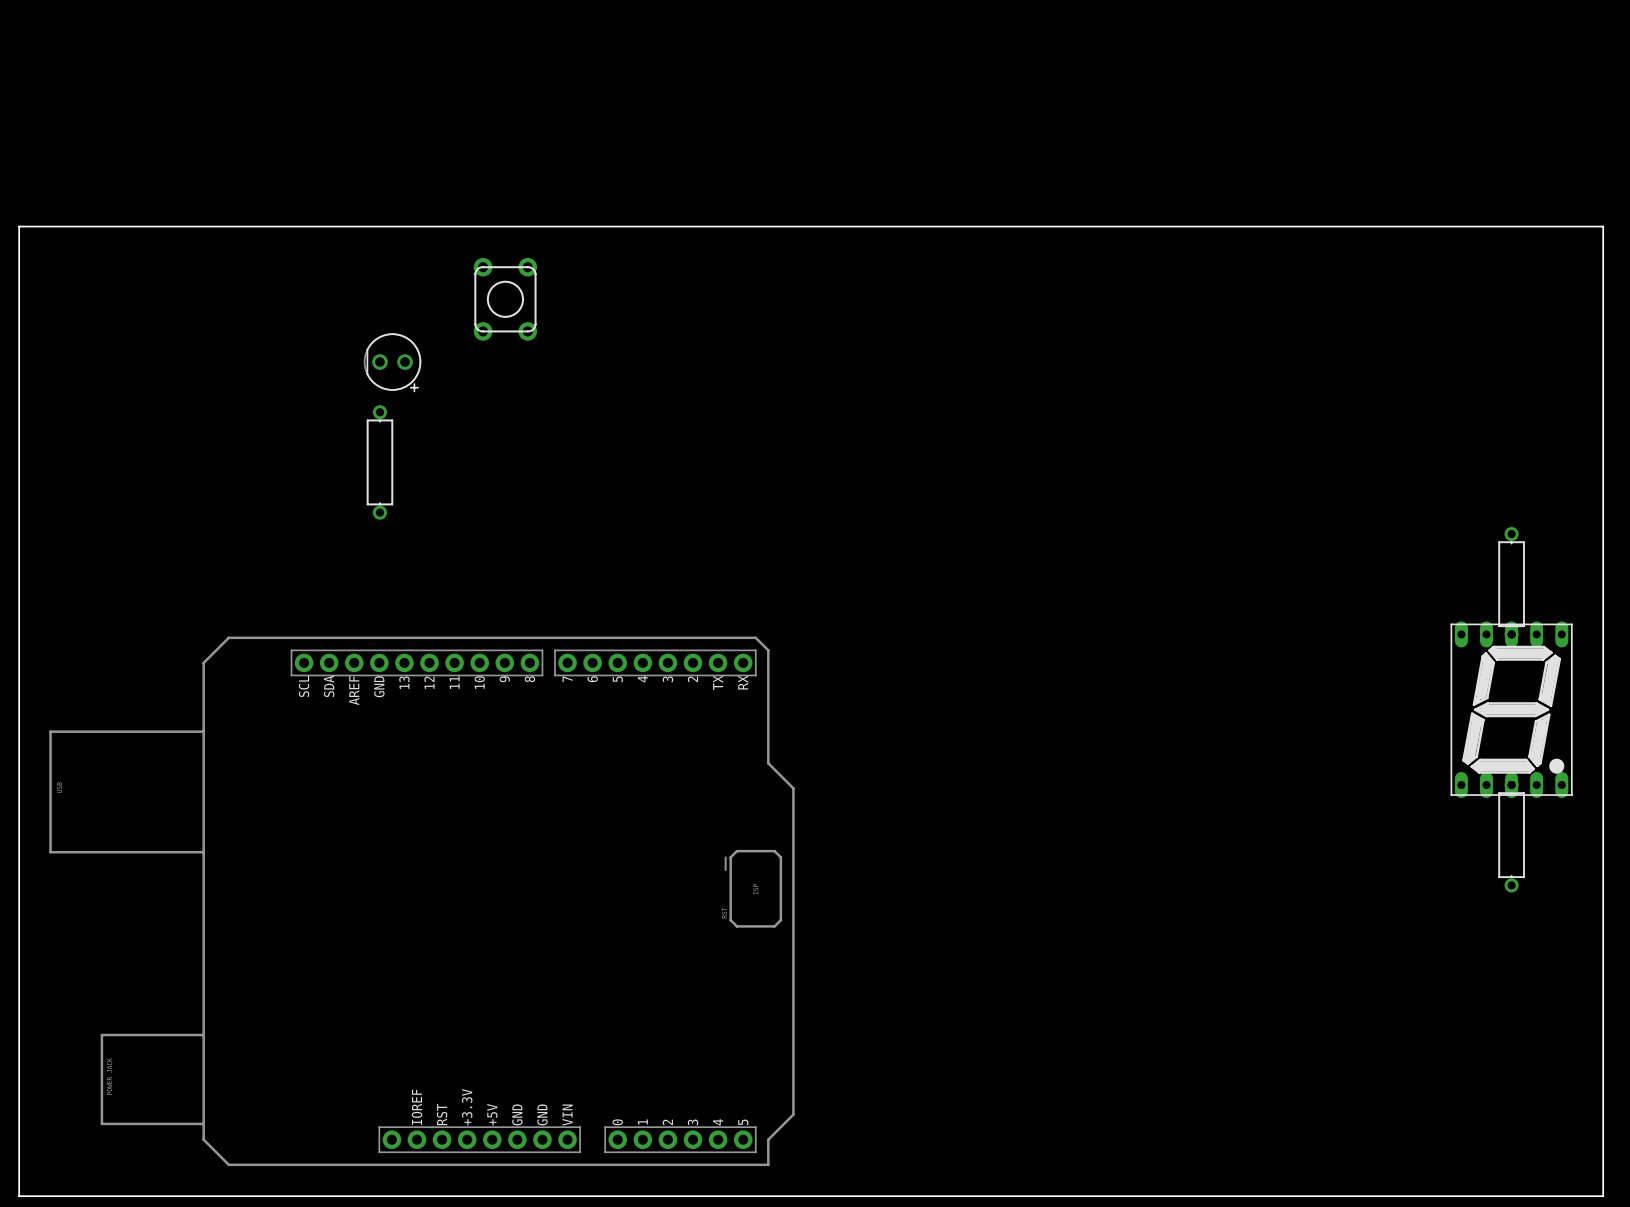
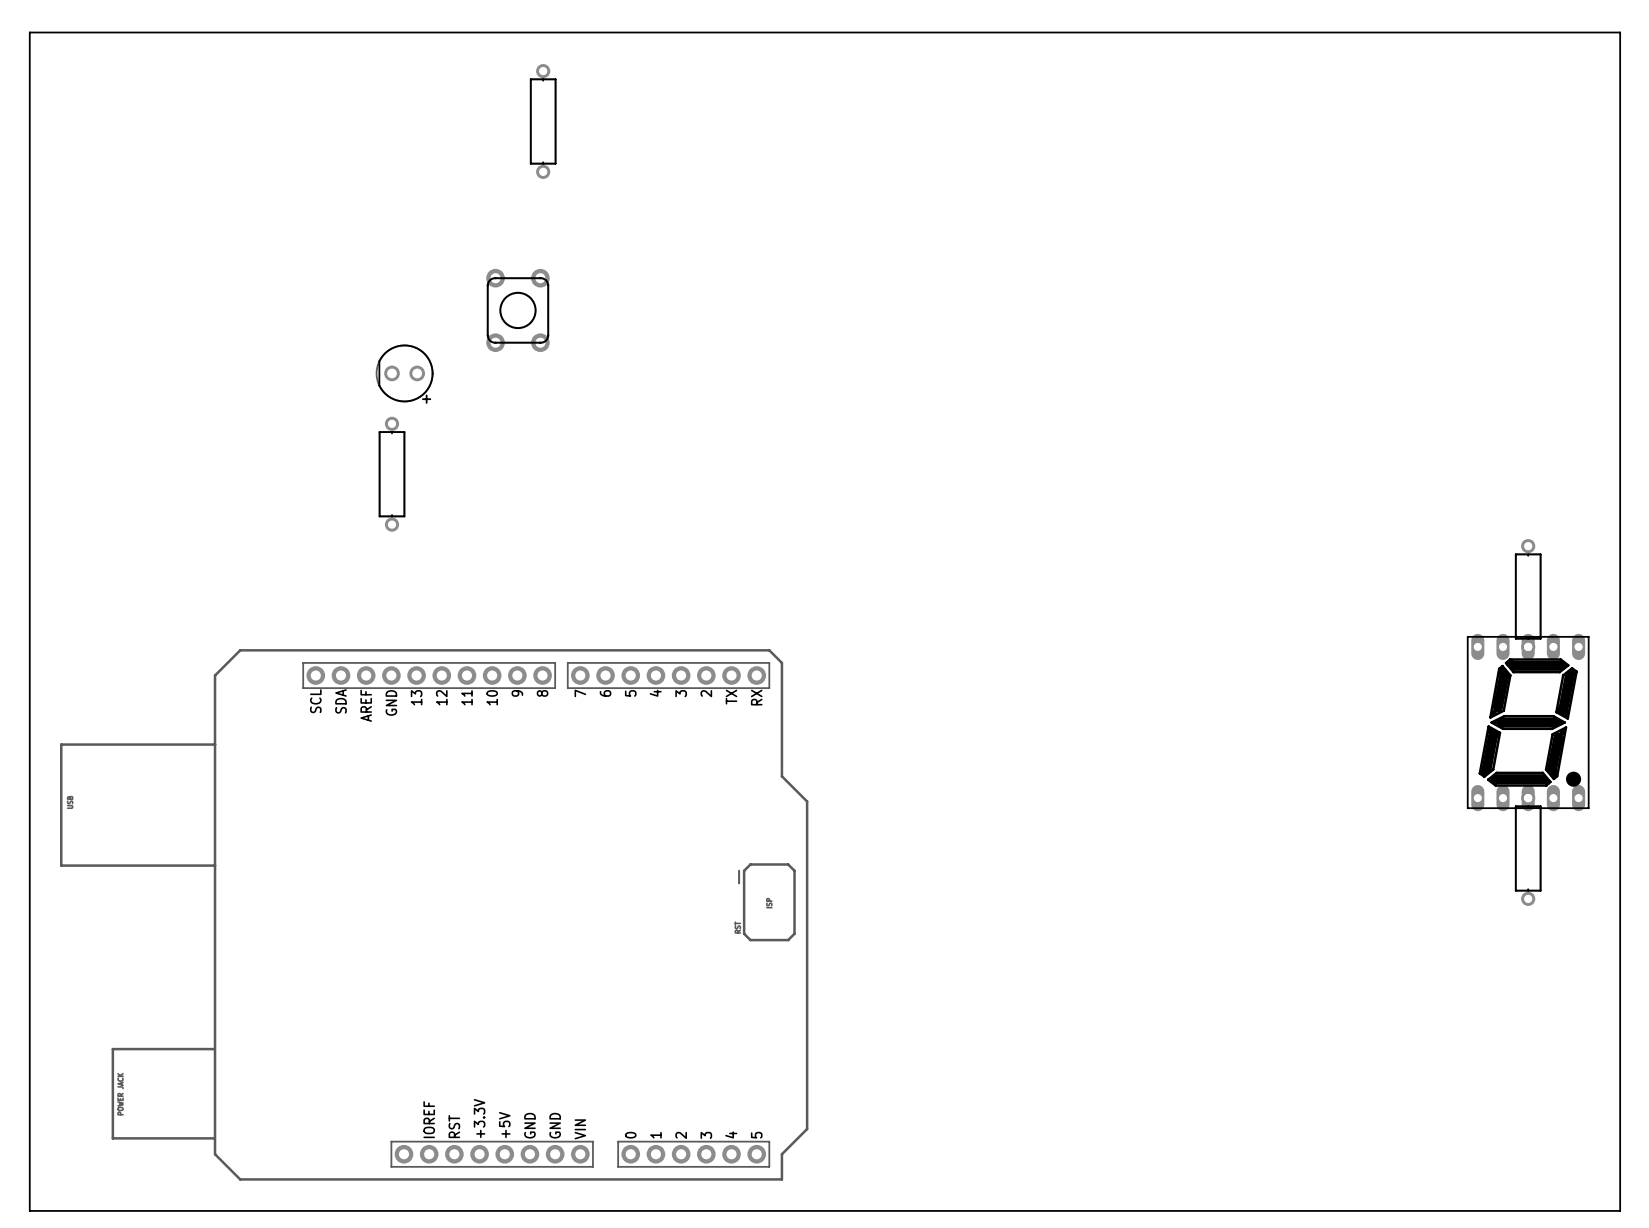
part: none -> (543, 121)
board edge: (19, 226) (1603, 226) -> (29, 237) (29, 32) (1620, 32) (1620, 237)

